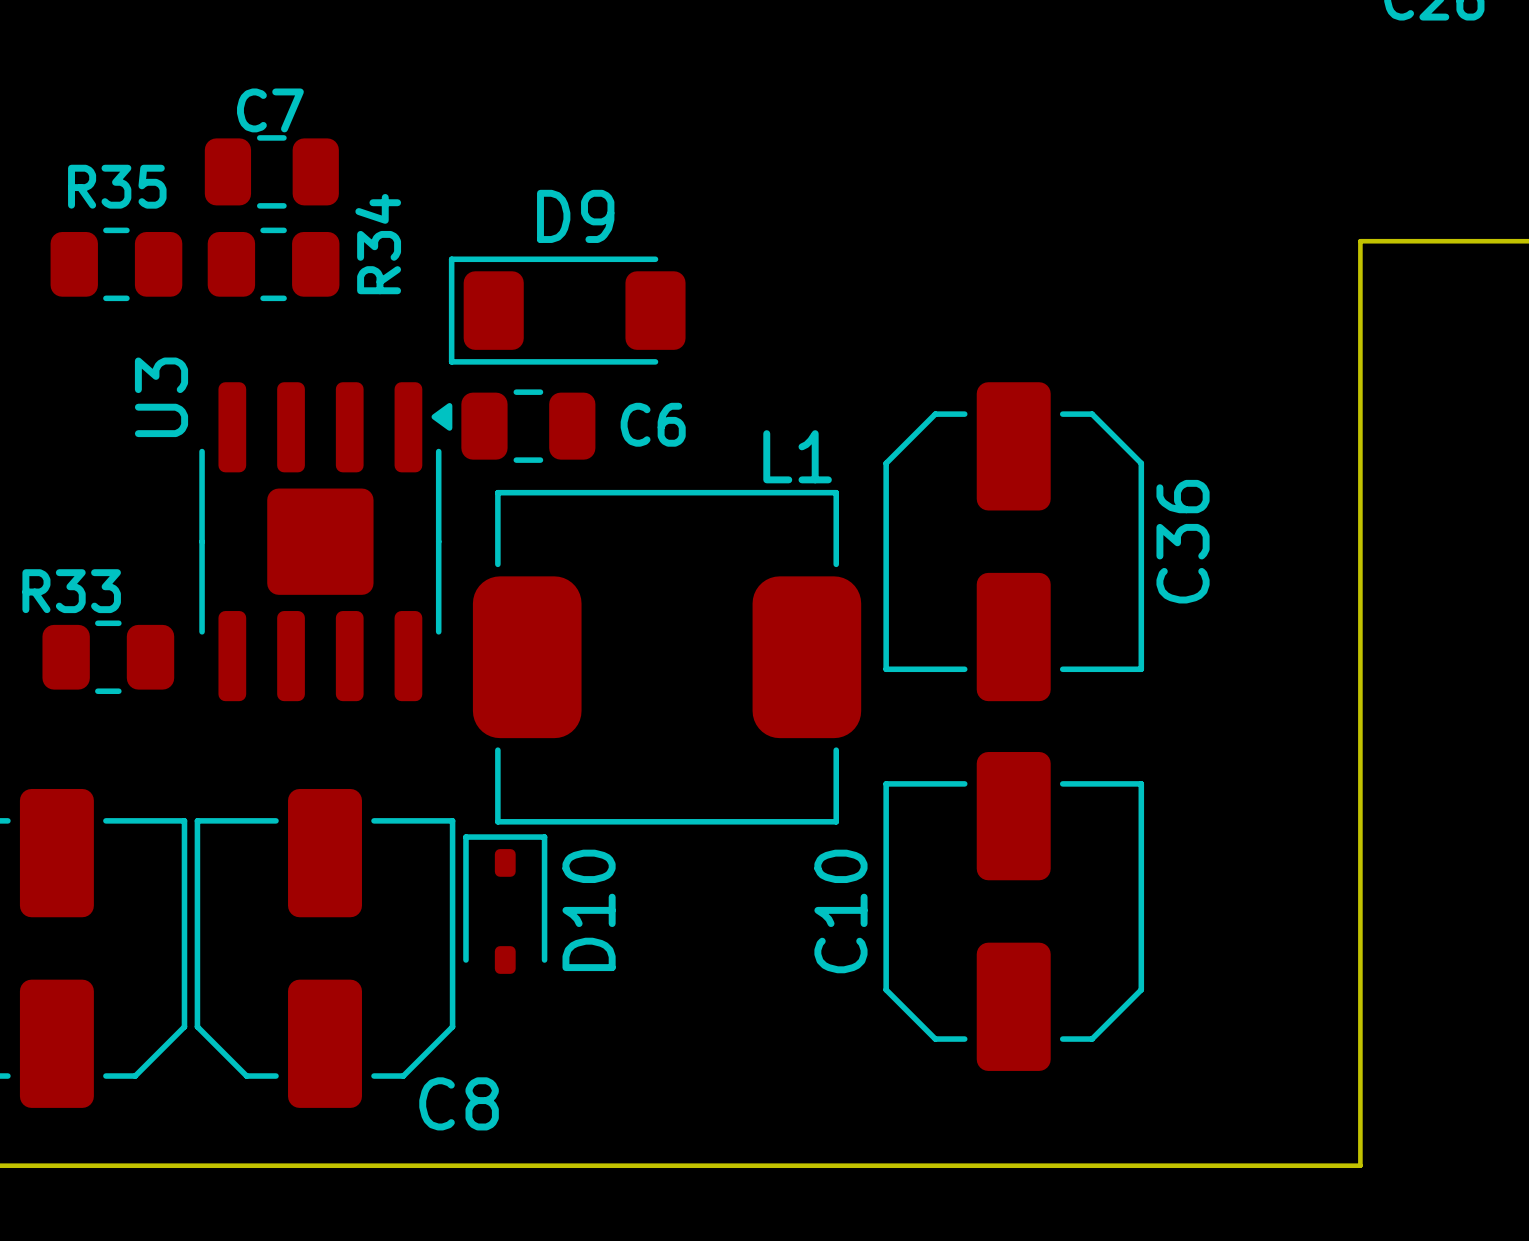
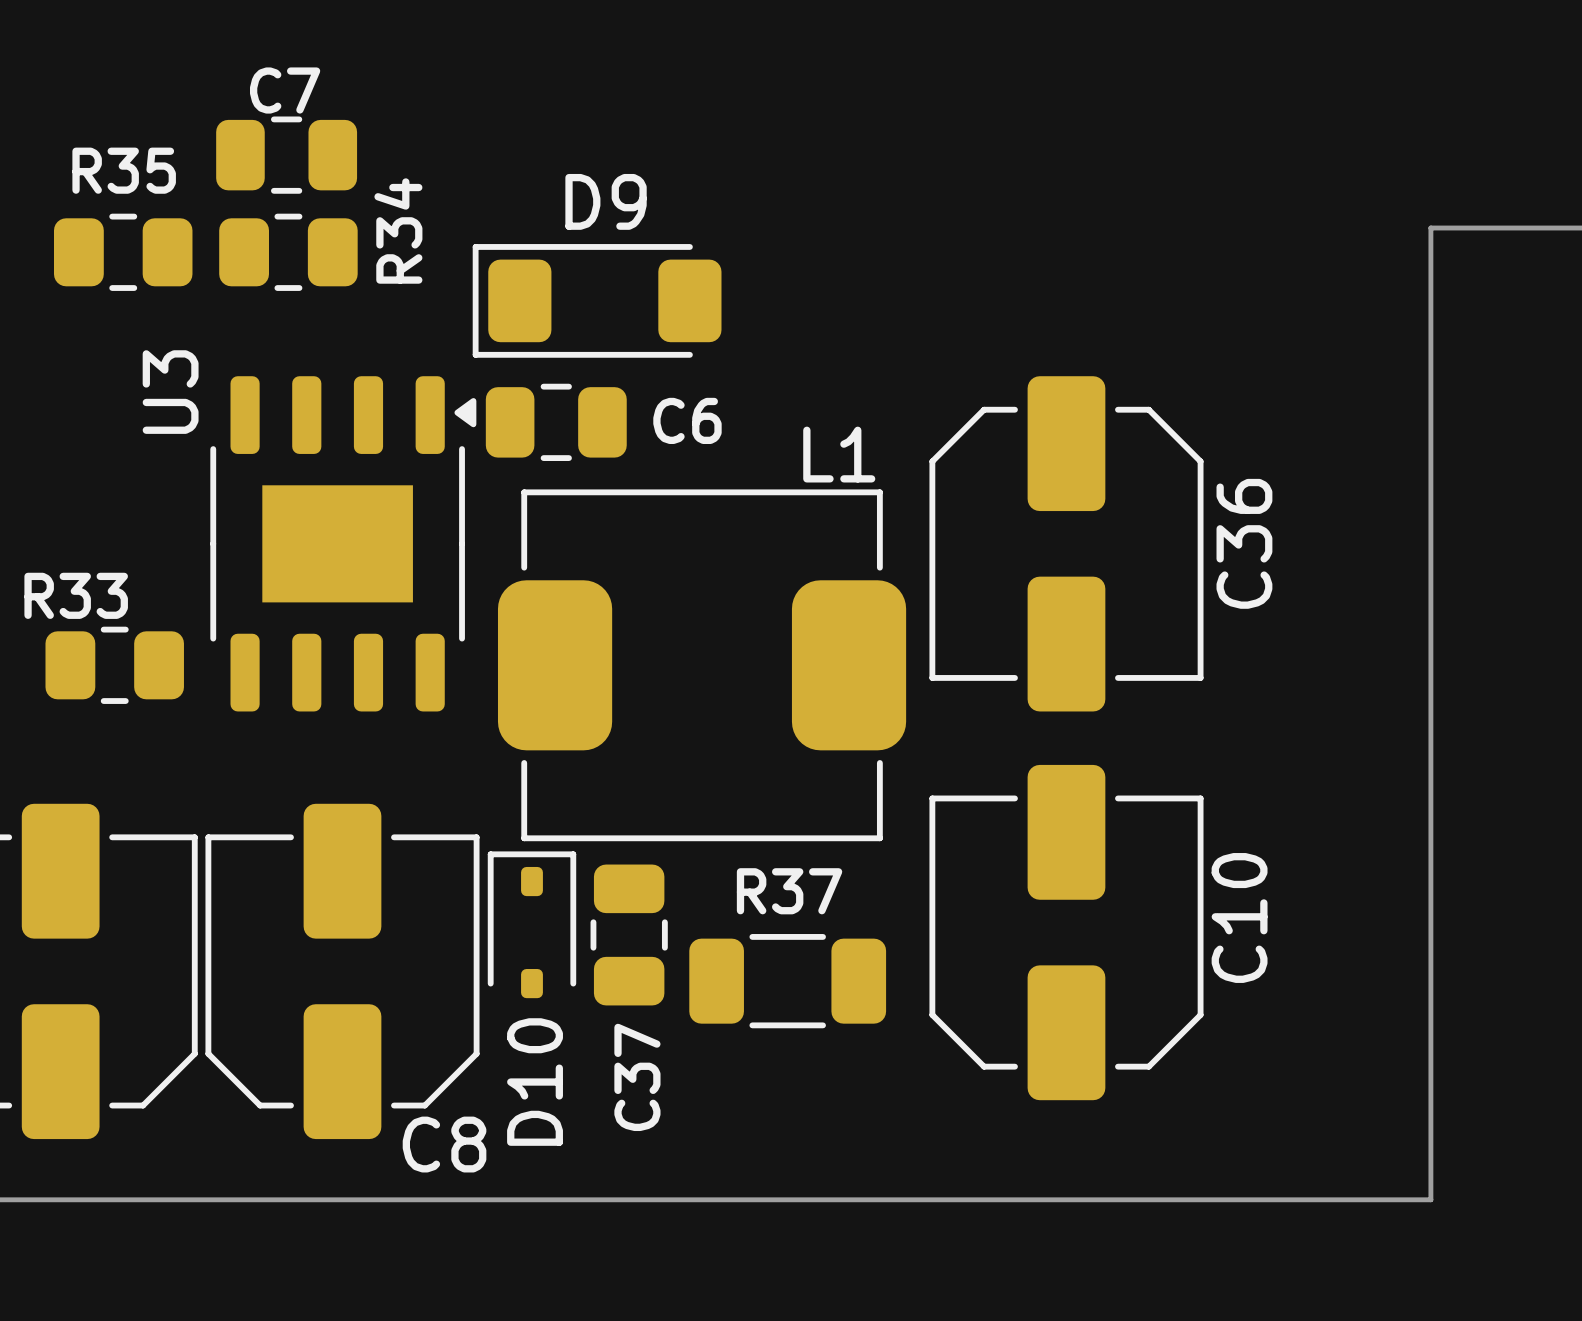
U3 footprint: [199, 382, 453, 702] -> [210, 376, 477, 712]
D10 name position: D10 (589, 910) -> D10 (535, 1082)
C10 name position: C10 (840, 911) -> C10 (1239, 917)
C37: none -> (629, 934)
R37: none -> (787, 981)
C8 name position: C8 (459, 1103) -> C8 (444, 1144)

